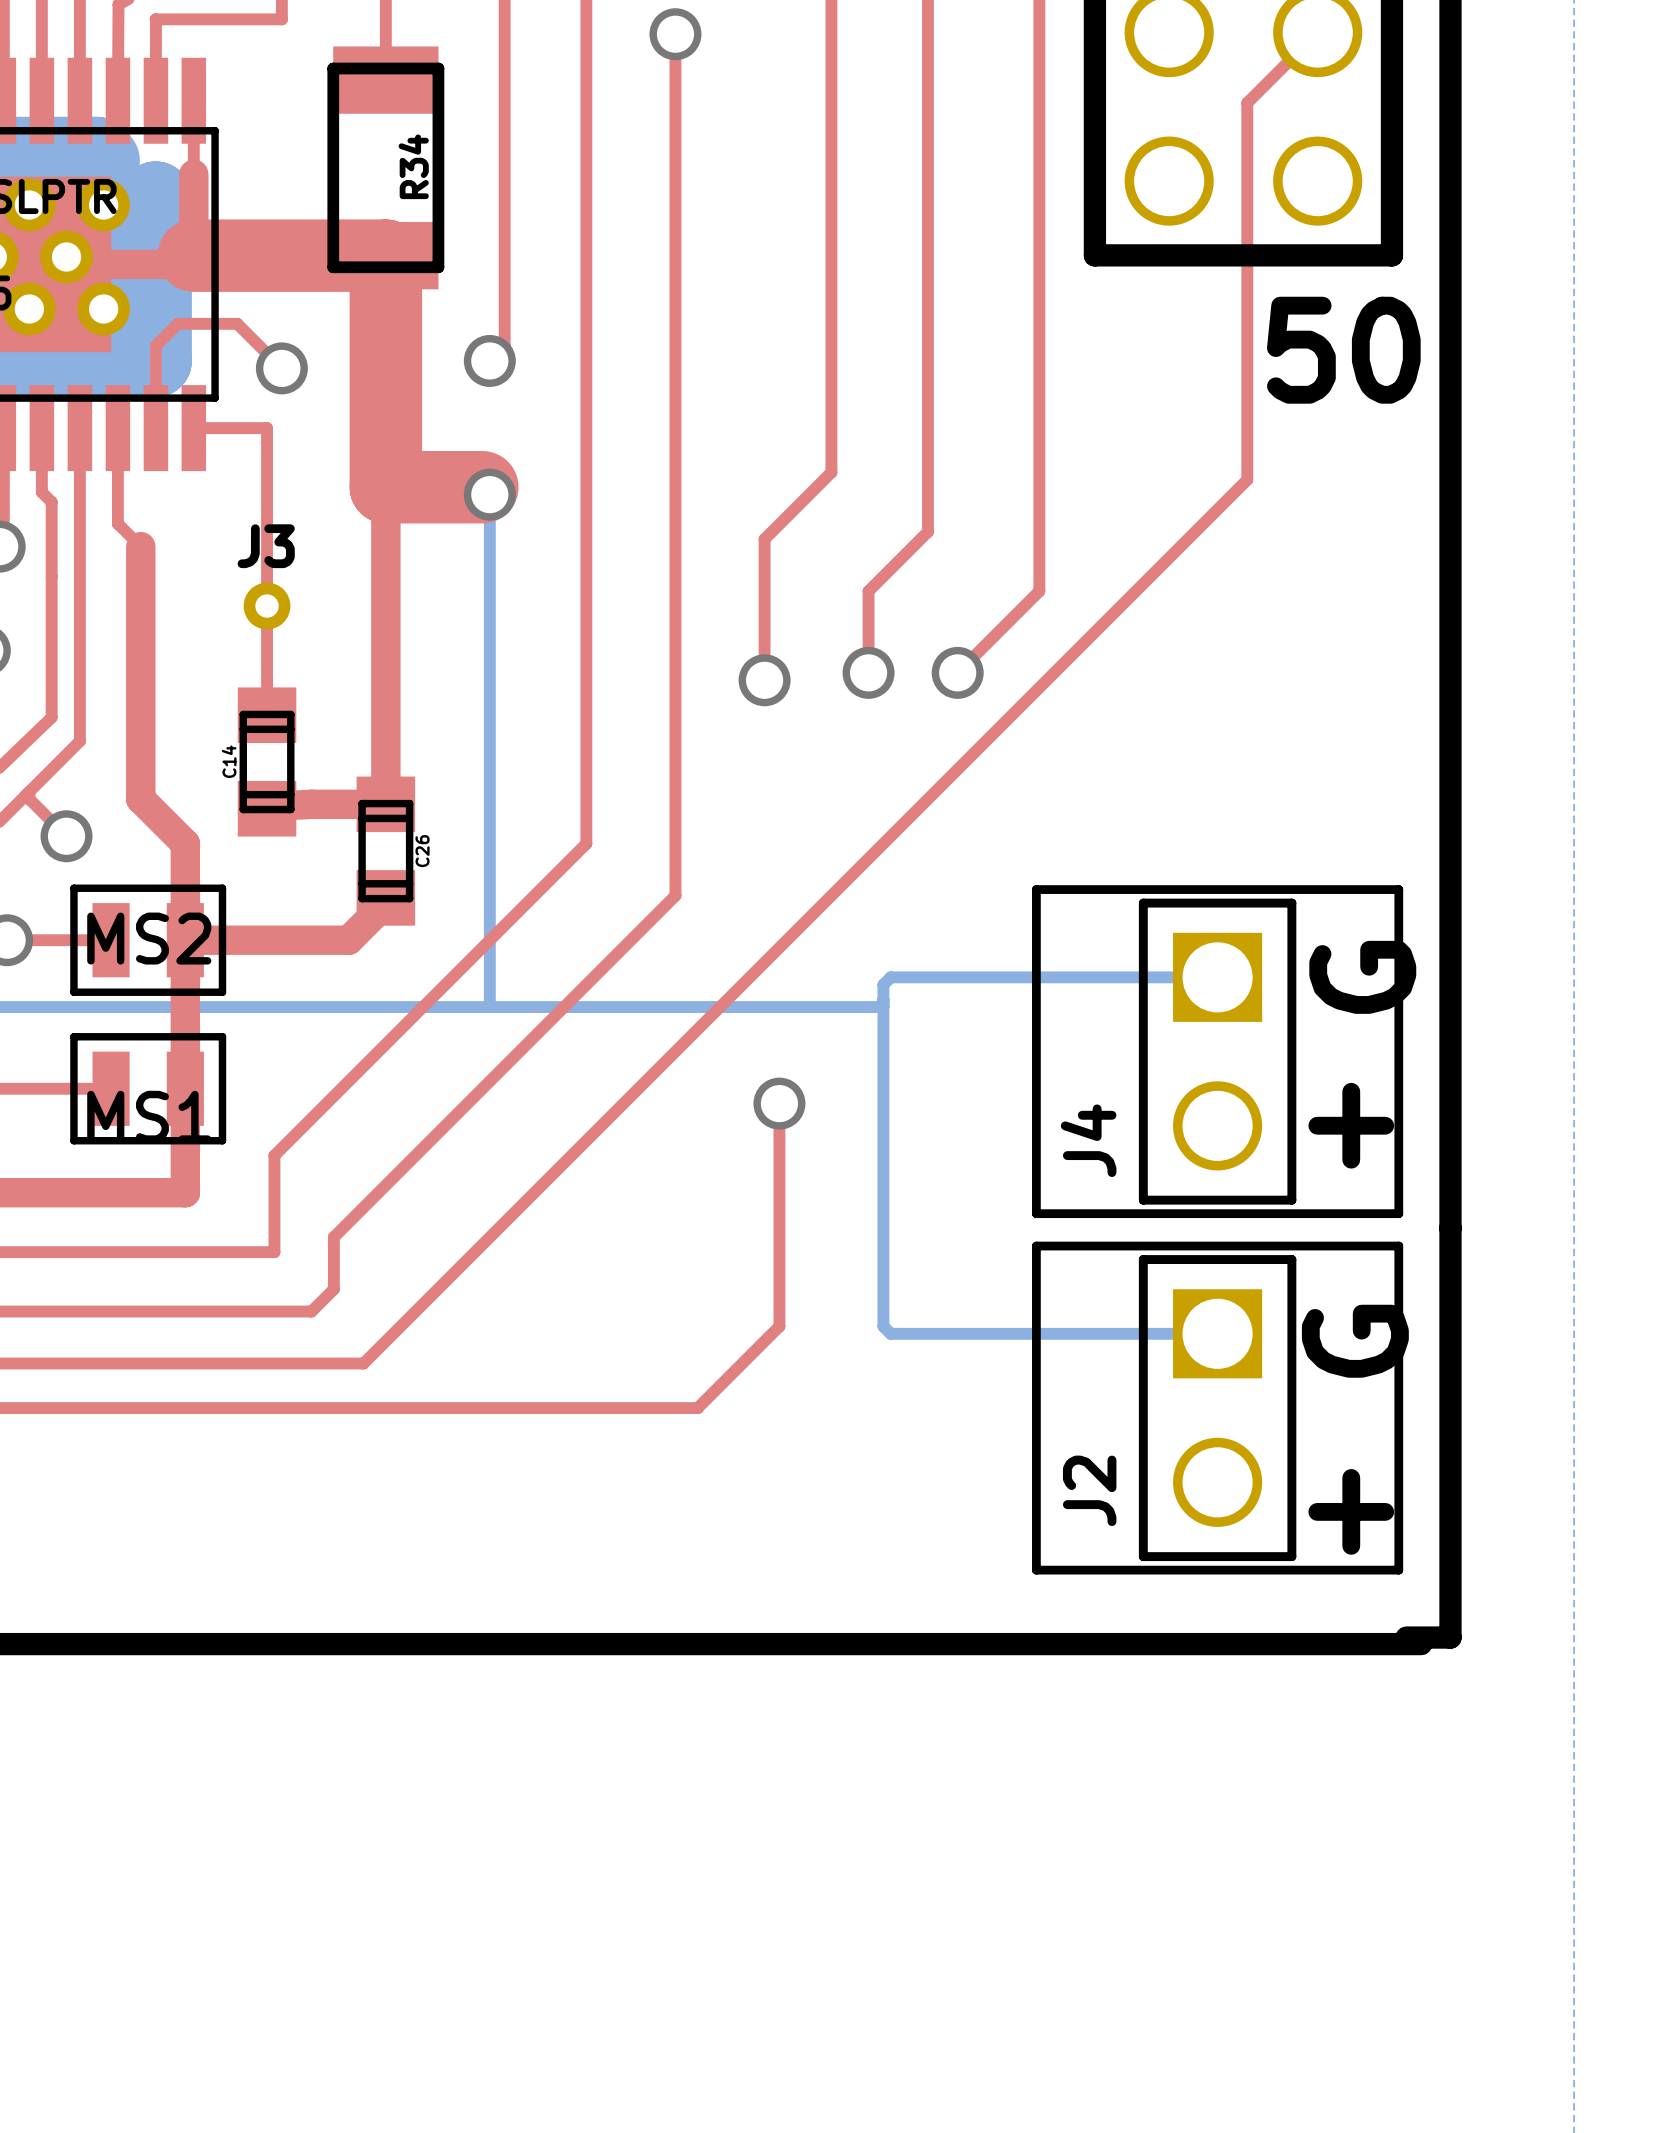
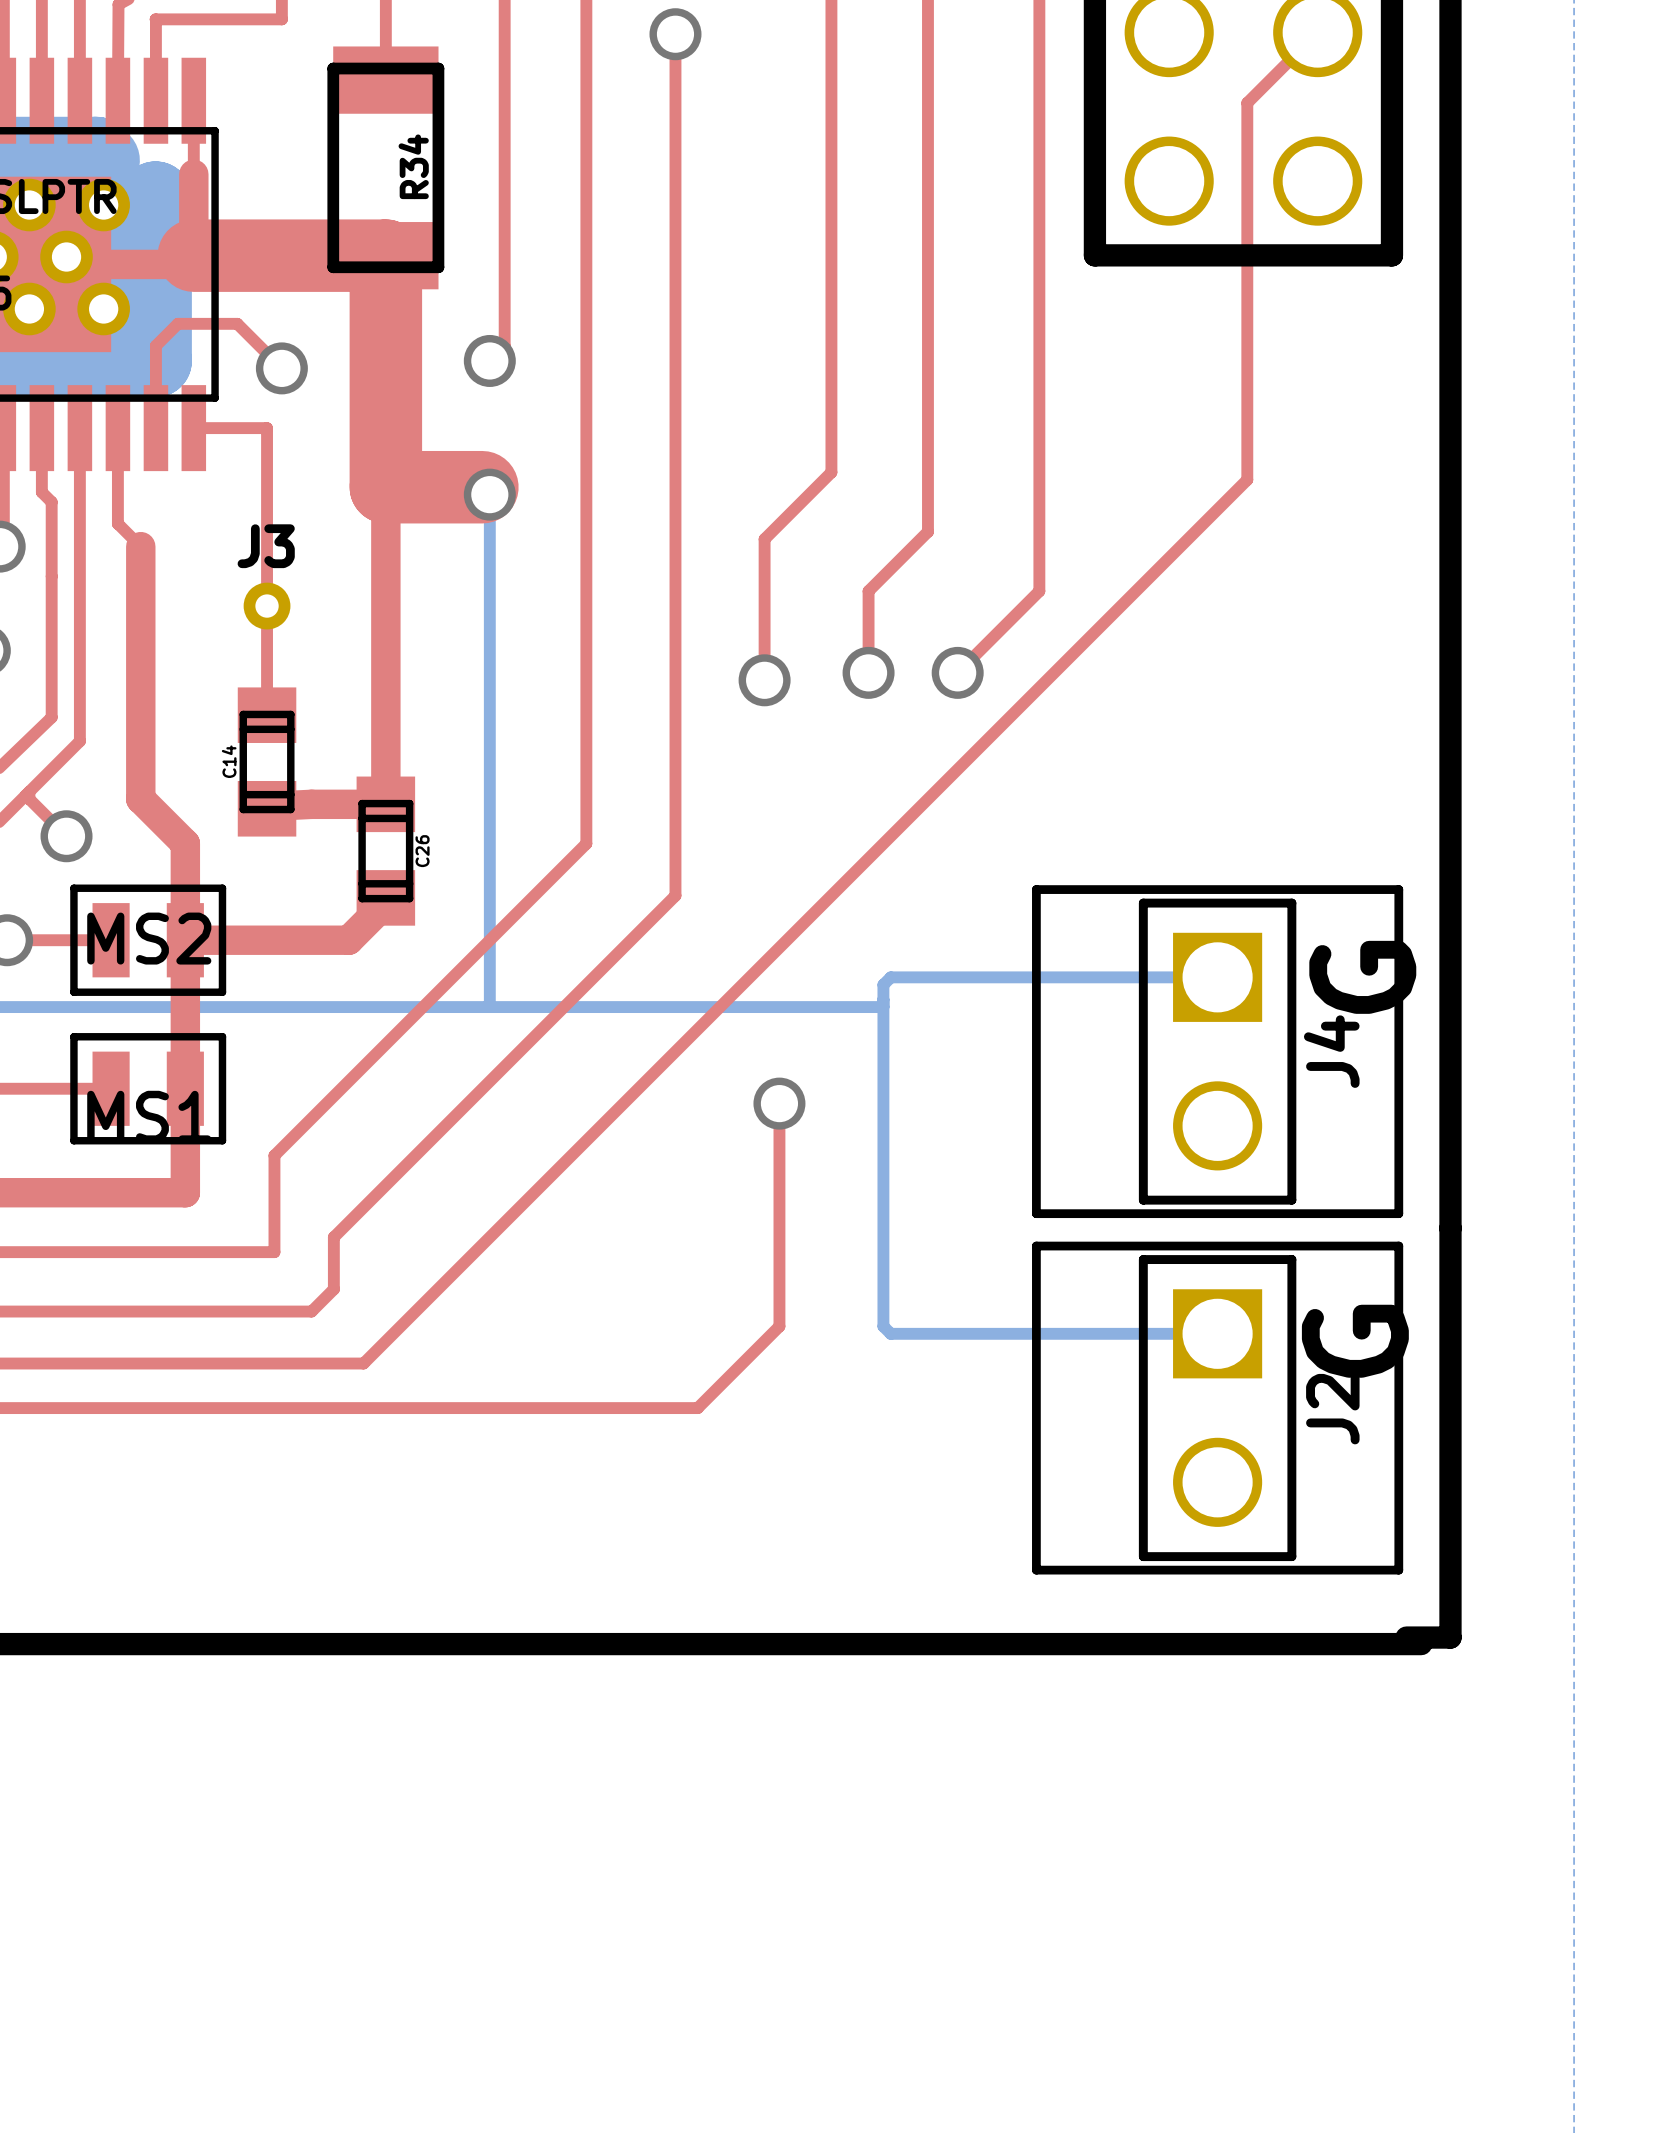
text: 50 (1343, 350) -> none
text: + (1351, 1125) -> none
J4 name position: J4 (1088, 1140) -> J4 (1331, 1051)
J2 name position: J2 (1089, 1490) -> J2 (1332, 1409)
text: + (1351, 1511) -> none

